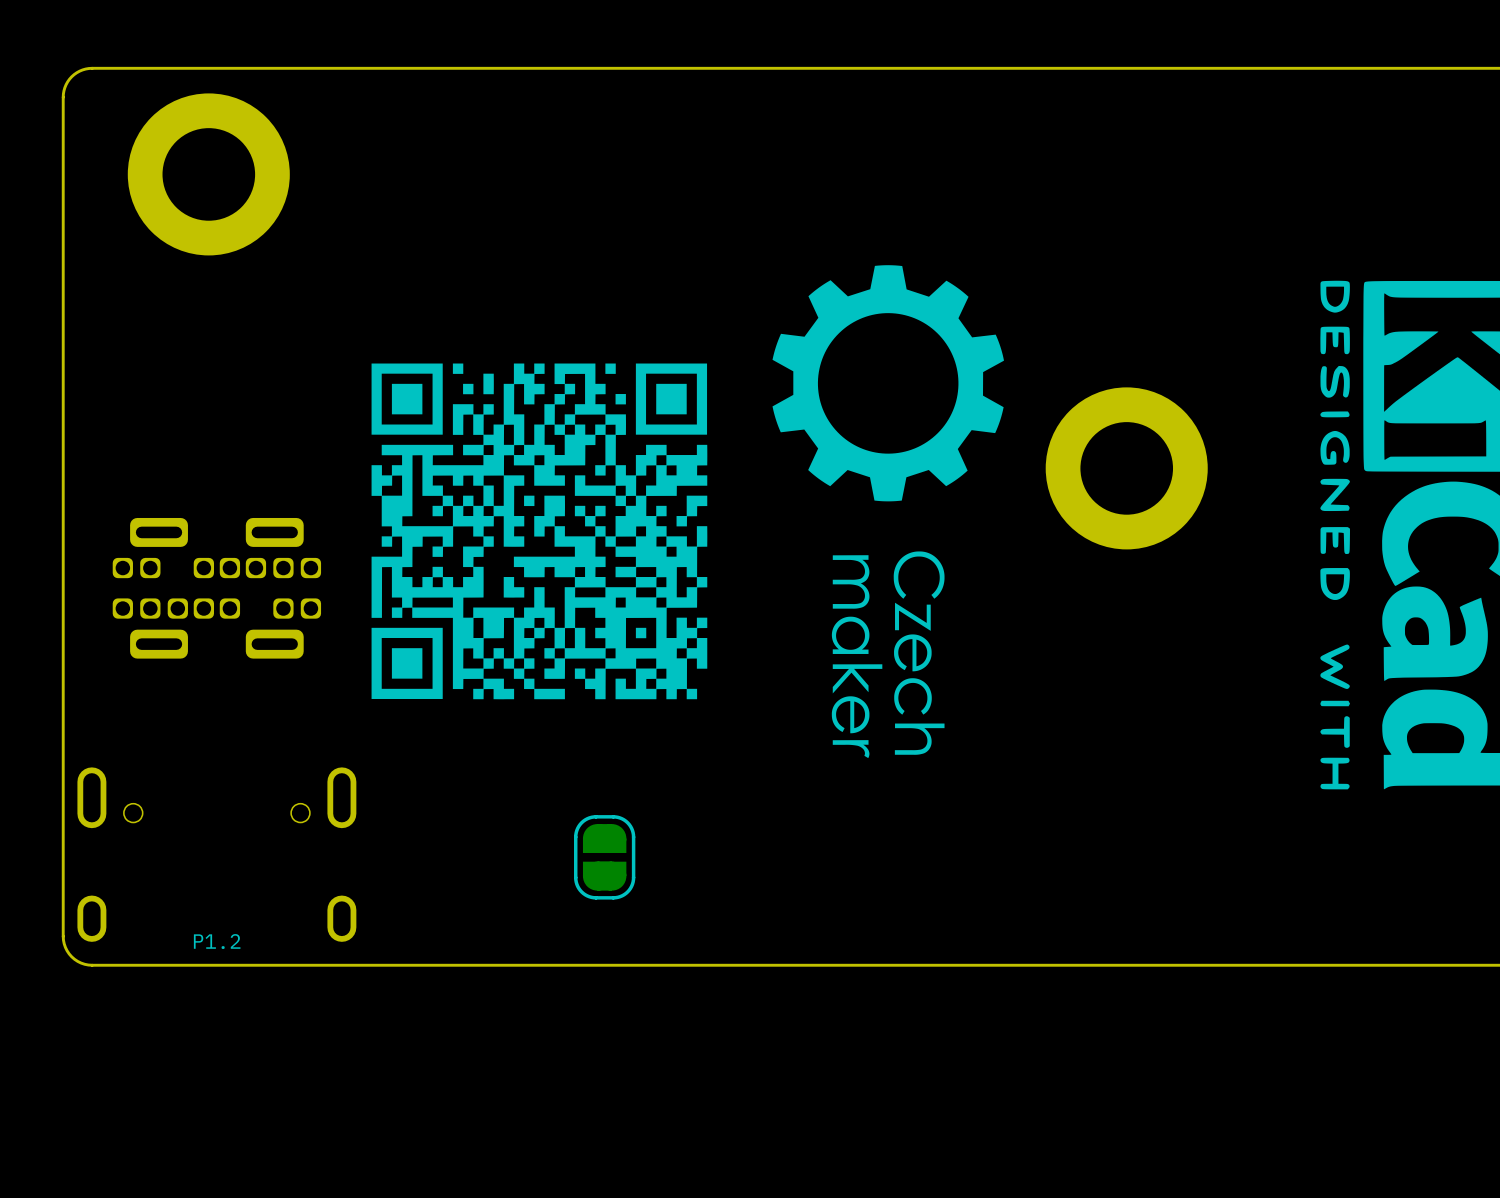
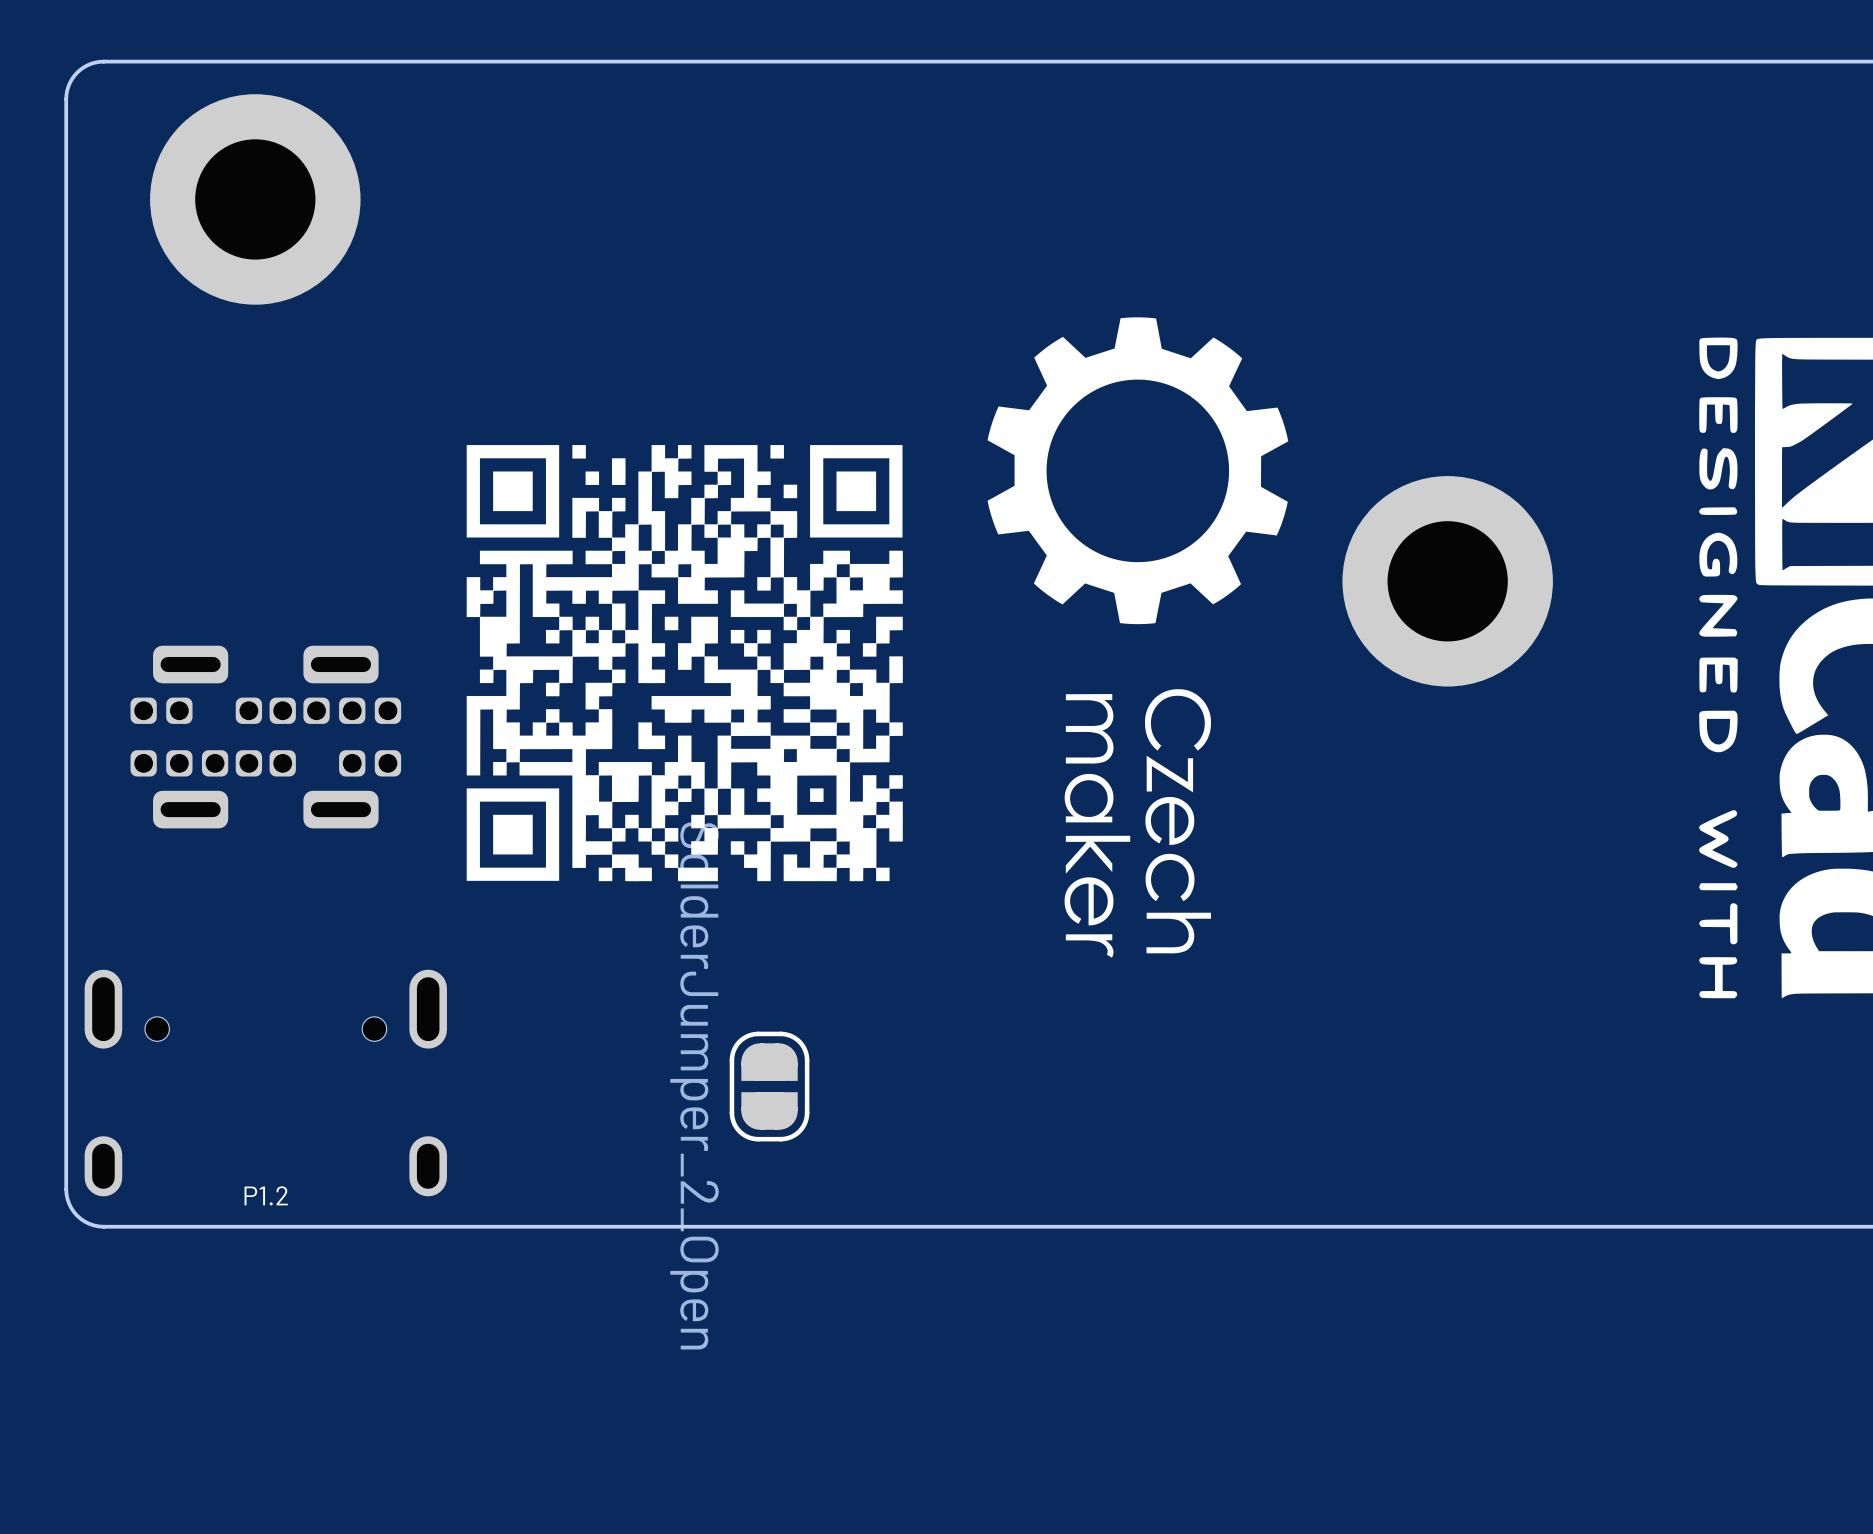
part value: none -> SolderJumper_2_Open (694, 1085)

